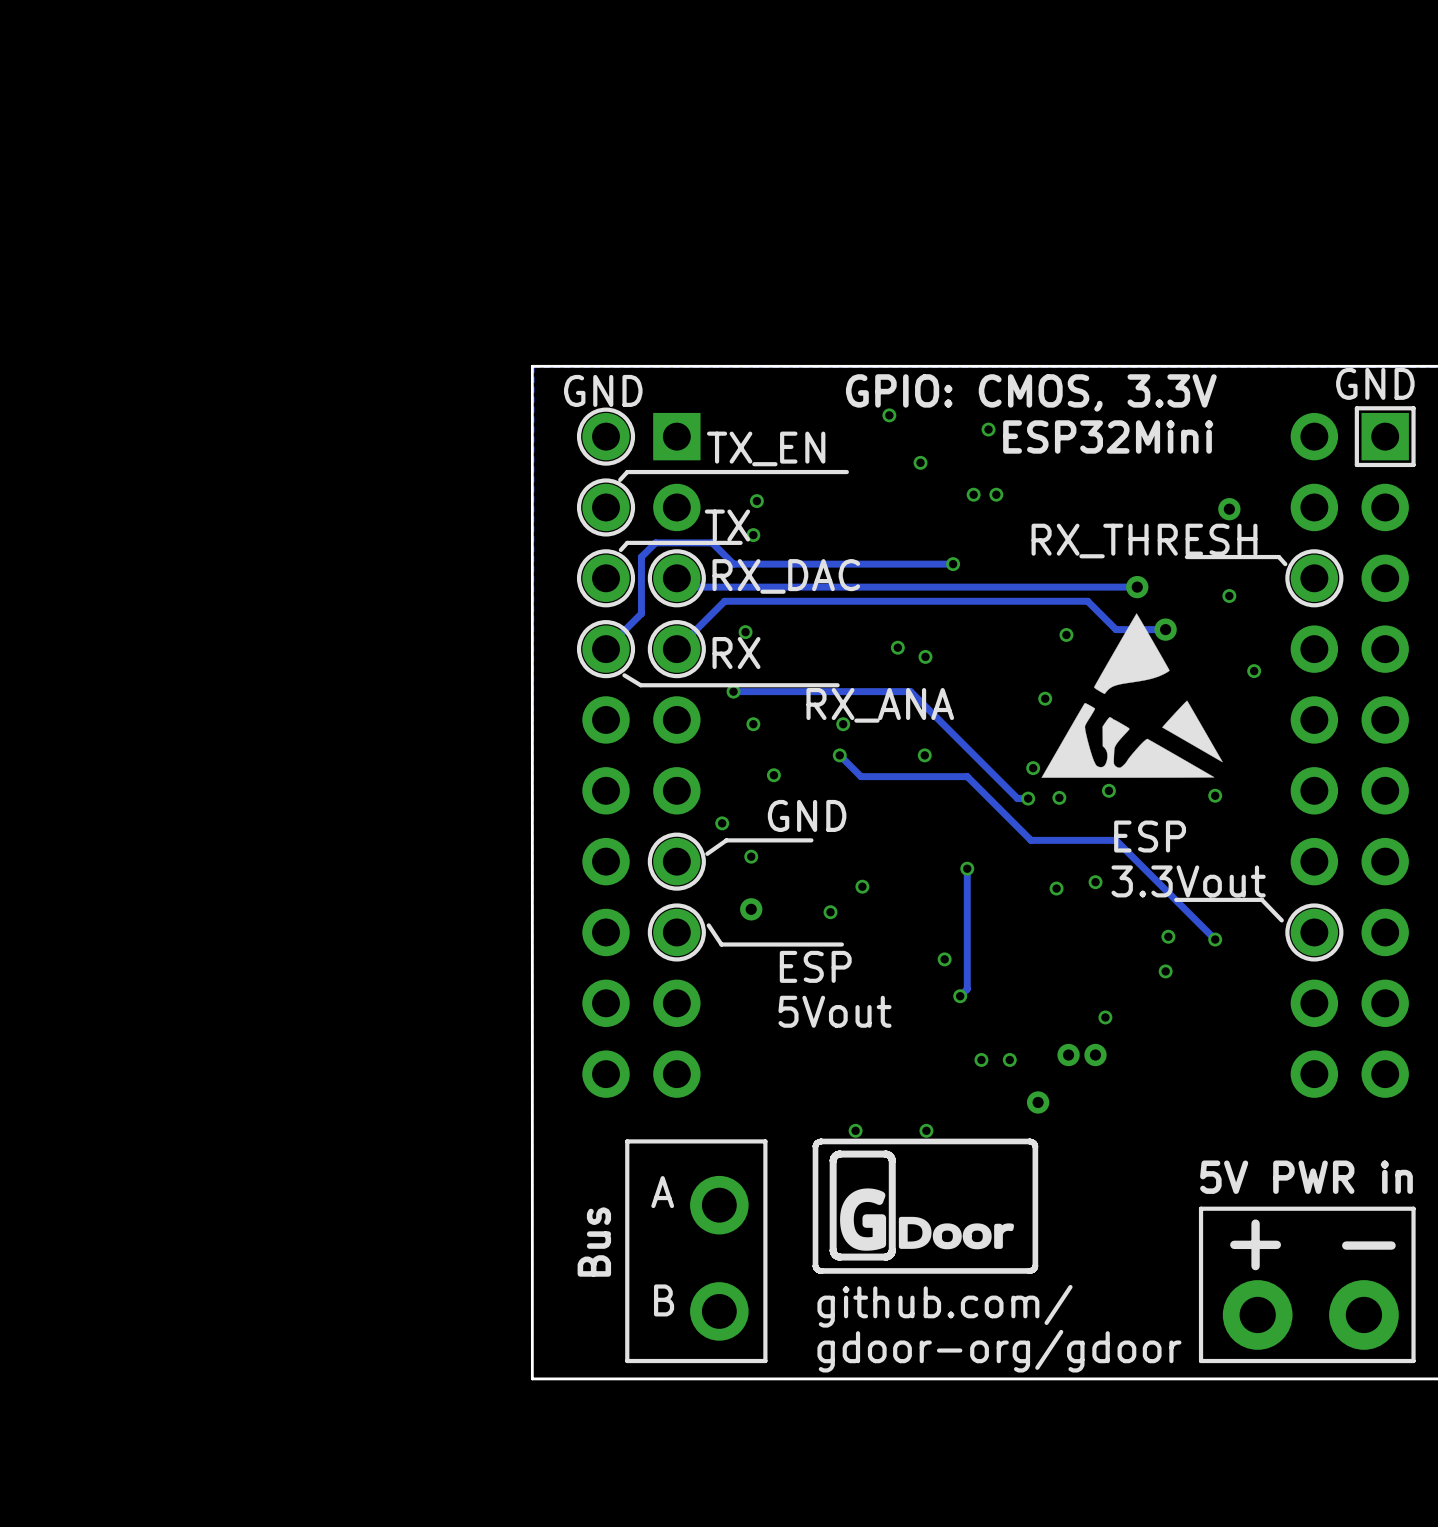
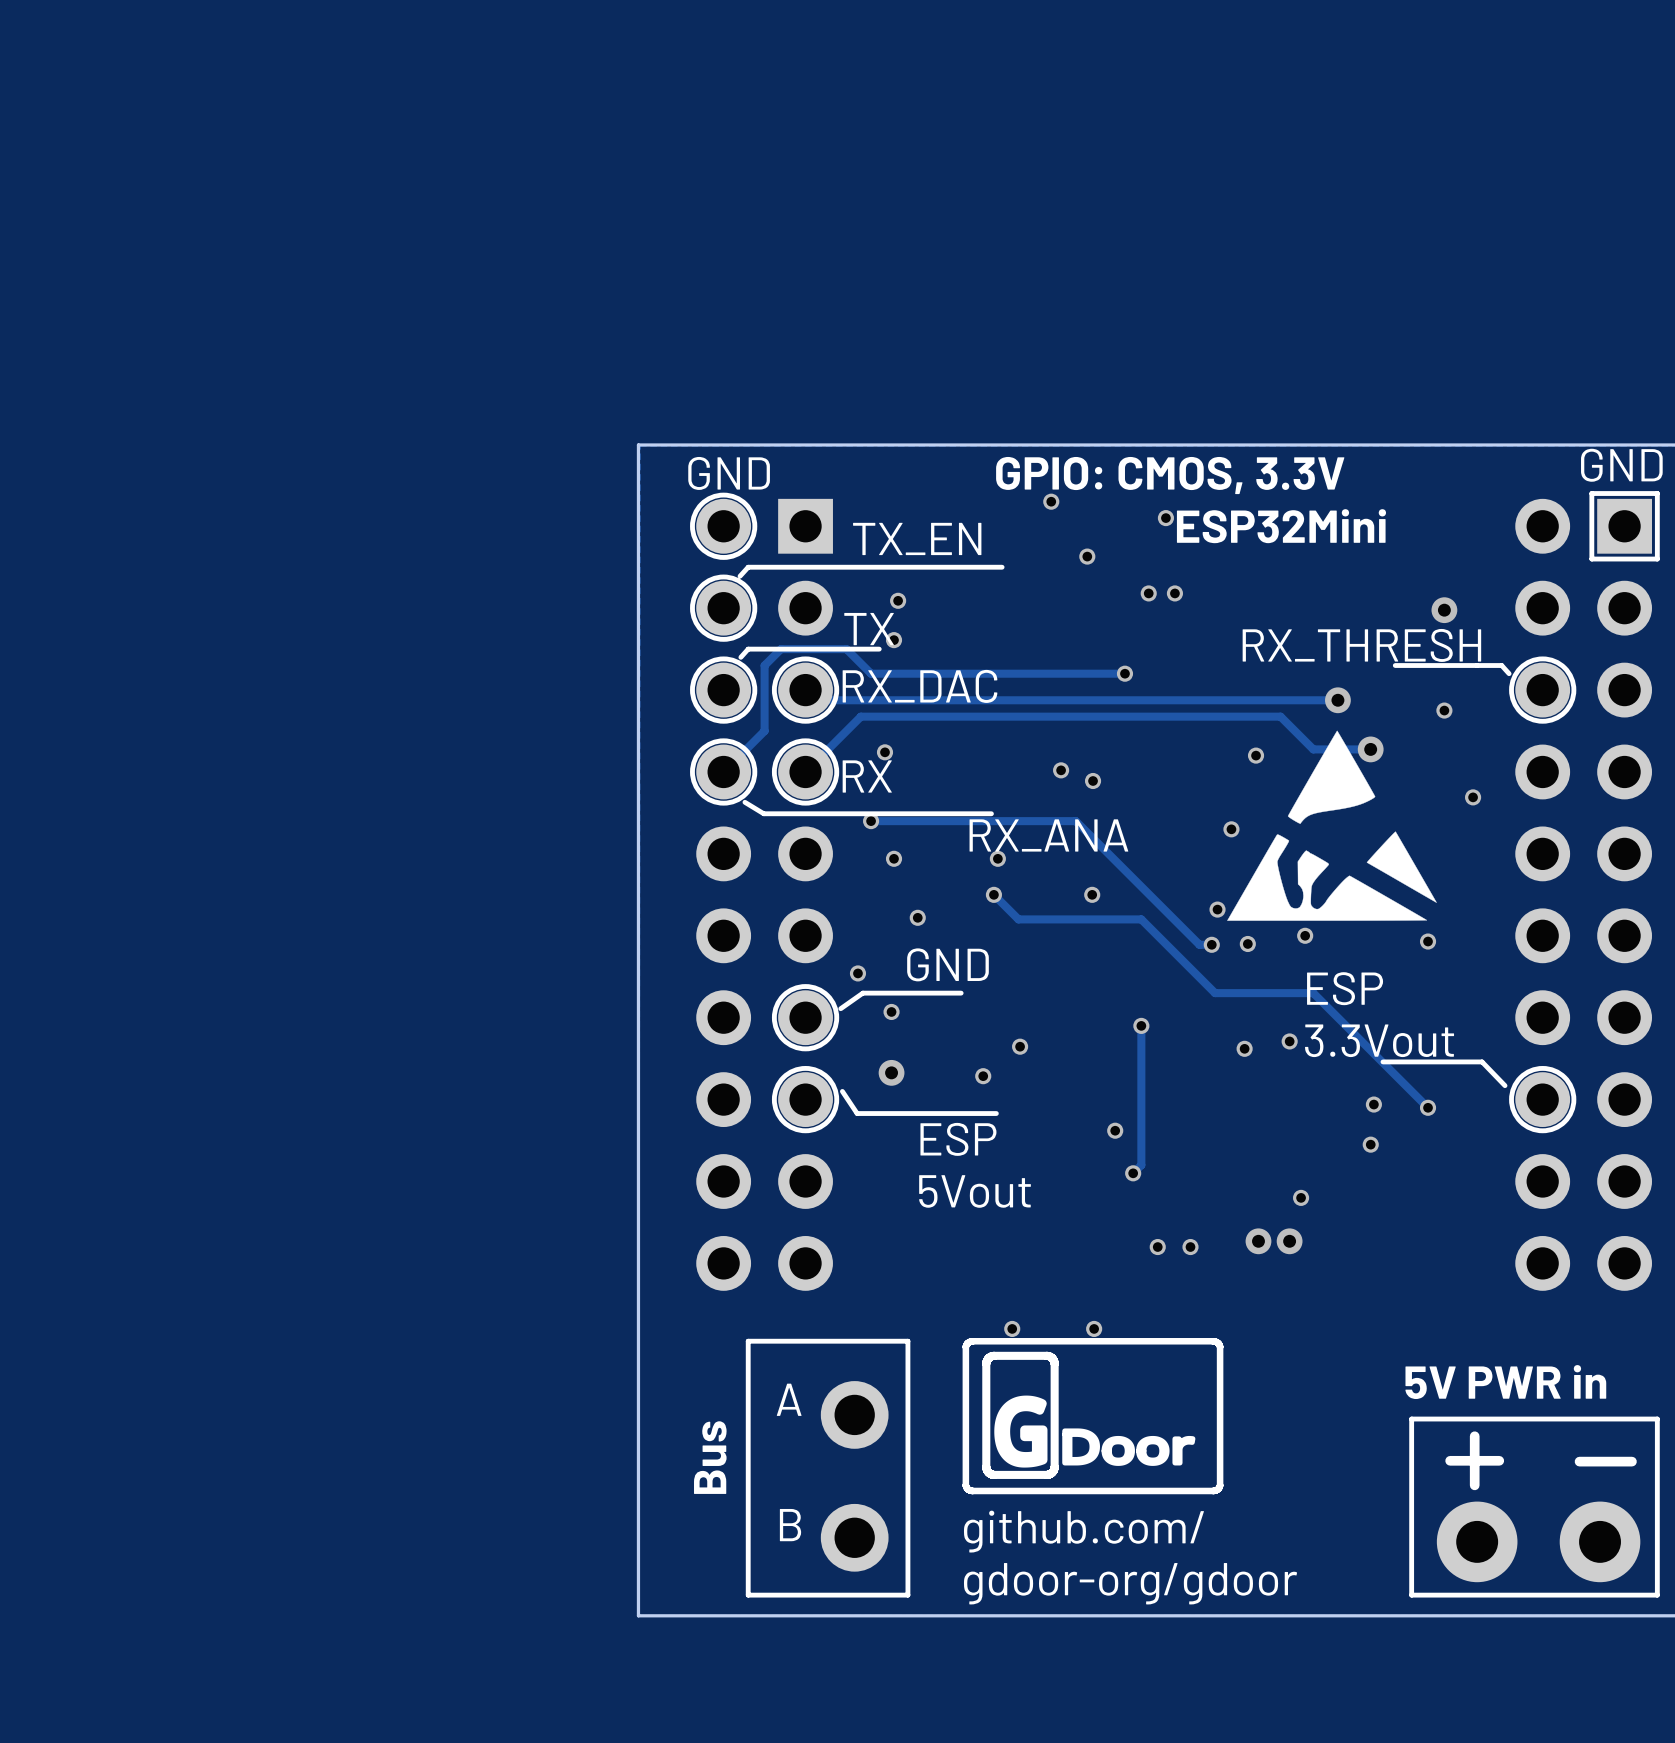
via: (1038, 1102) -> none

